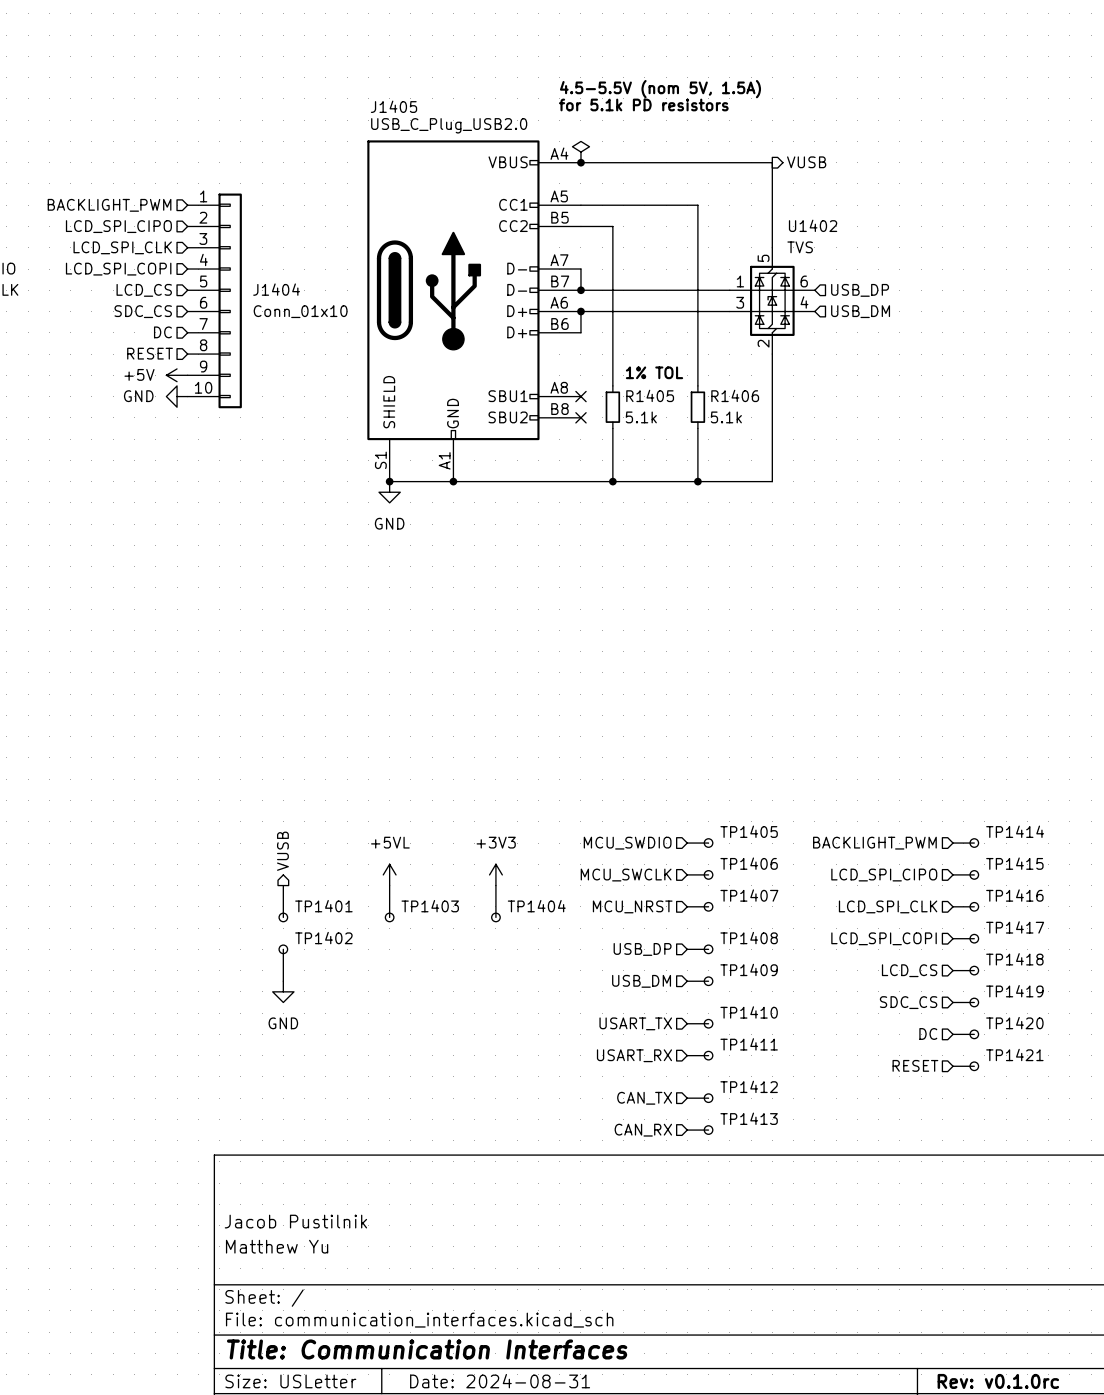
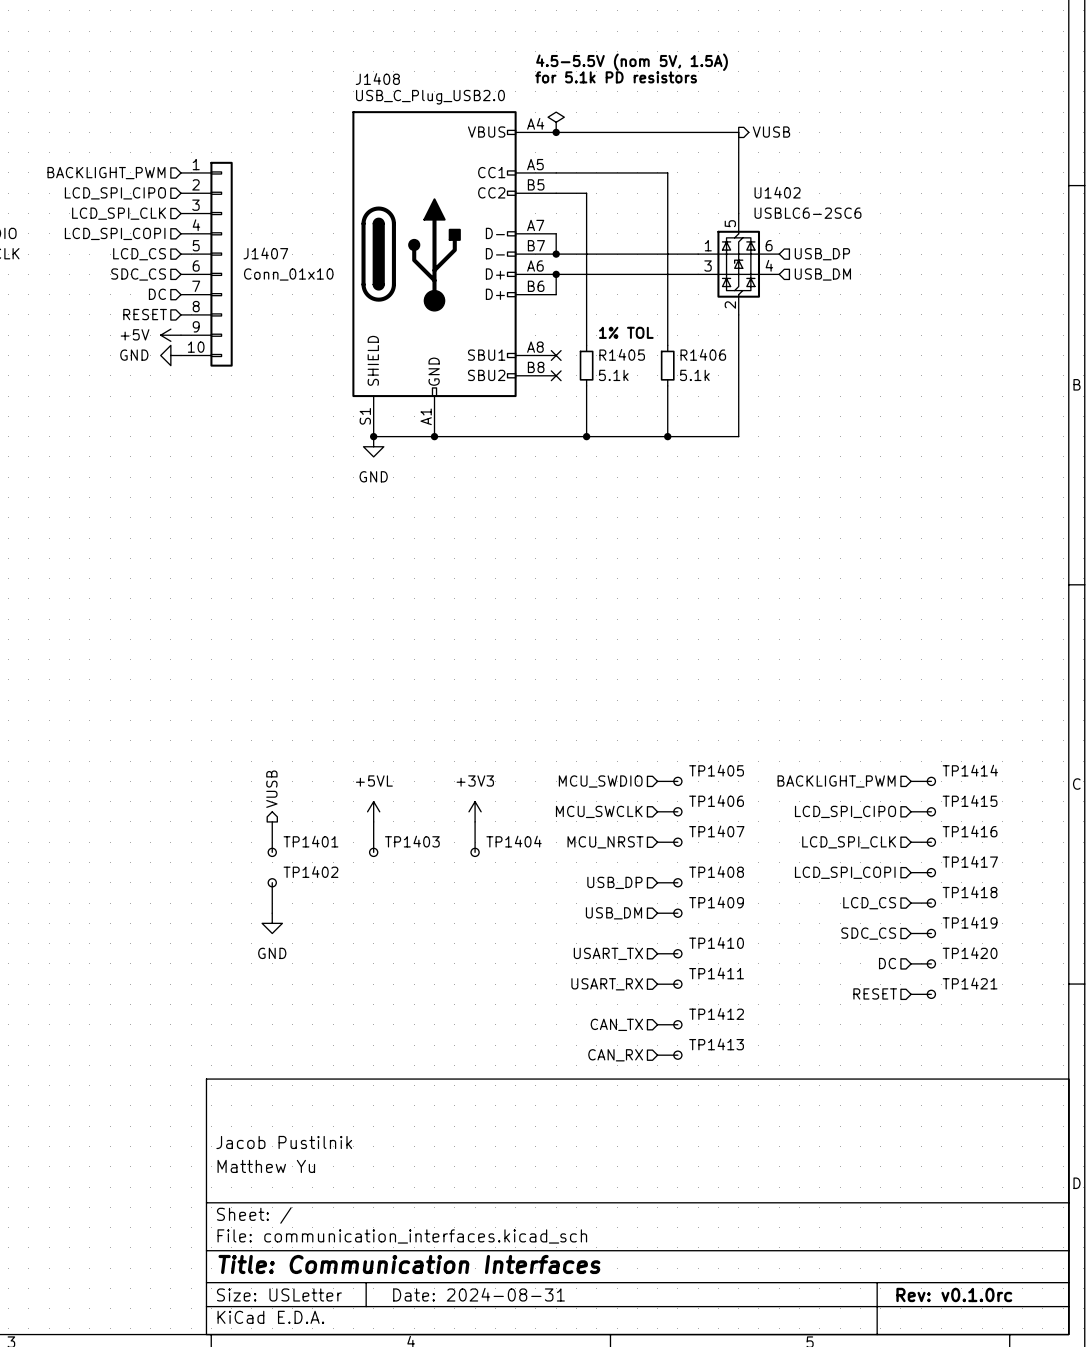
J1405 name: J1405 (394, 106) -> J1408 (377, 79)
U1402 value: TVS (800, 247) -> USBLC6-2SC6 (807, 213)
J1404 name: J1404 (276, 289) -> J1407 (265, 253)

